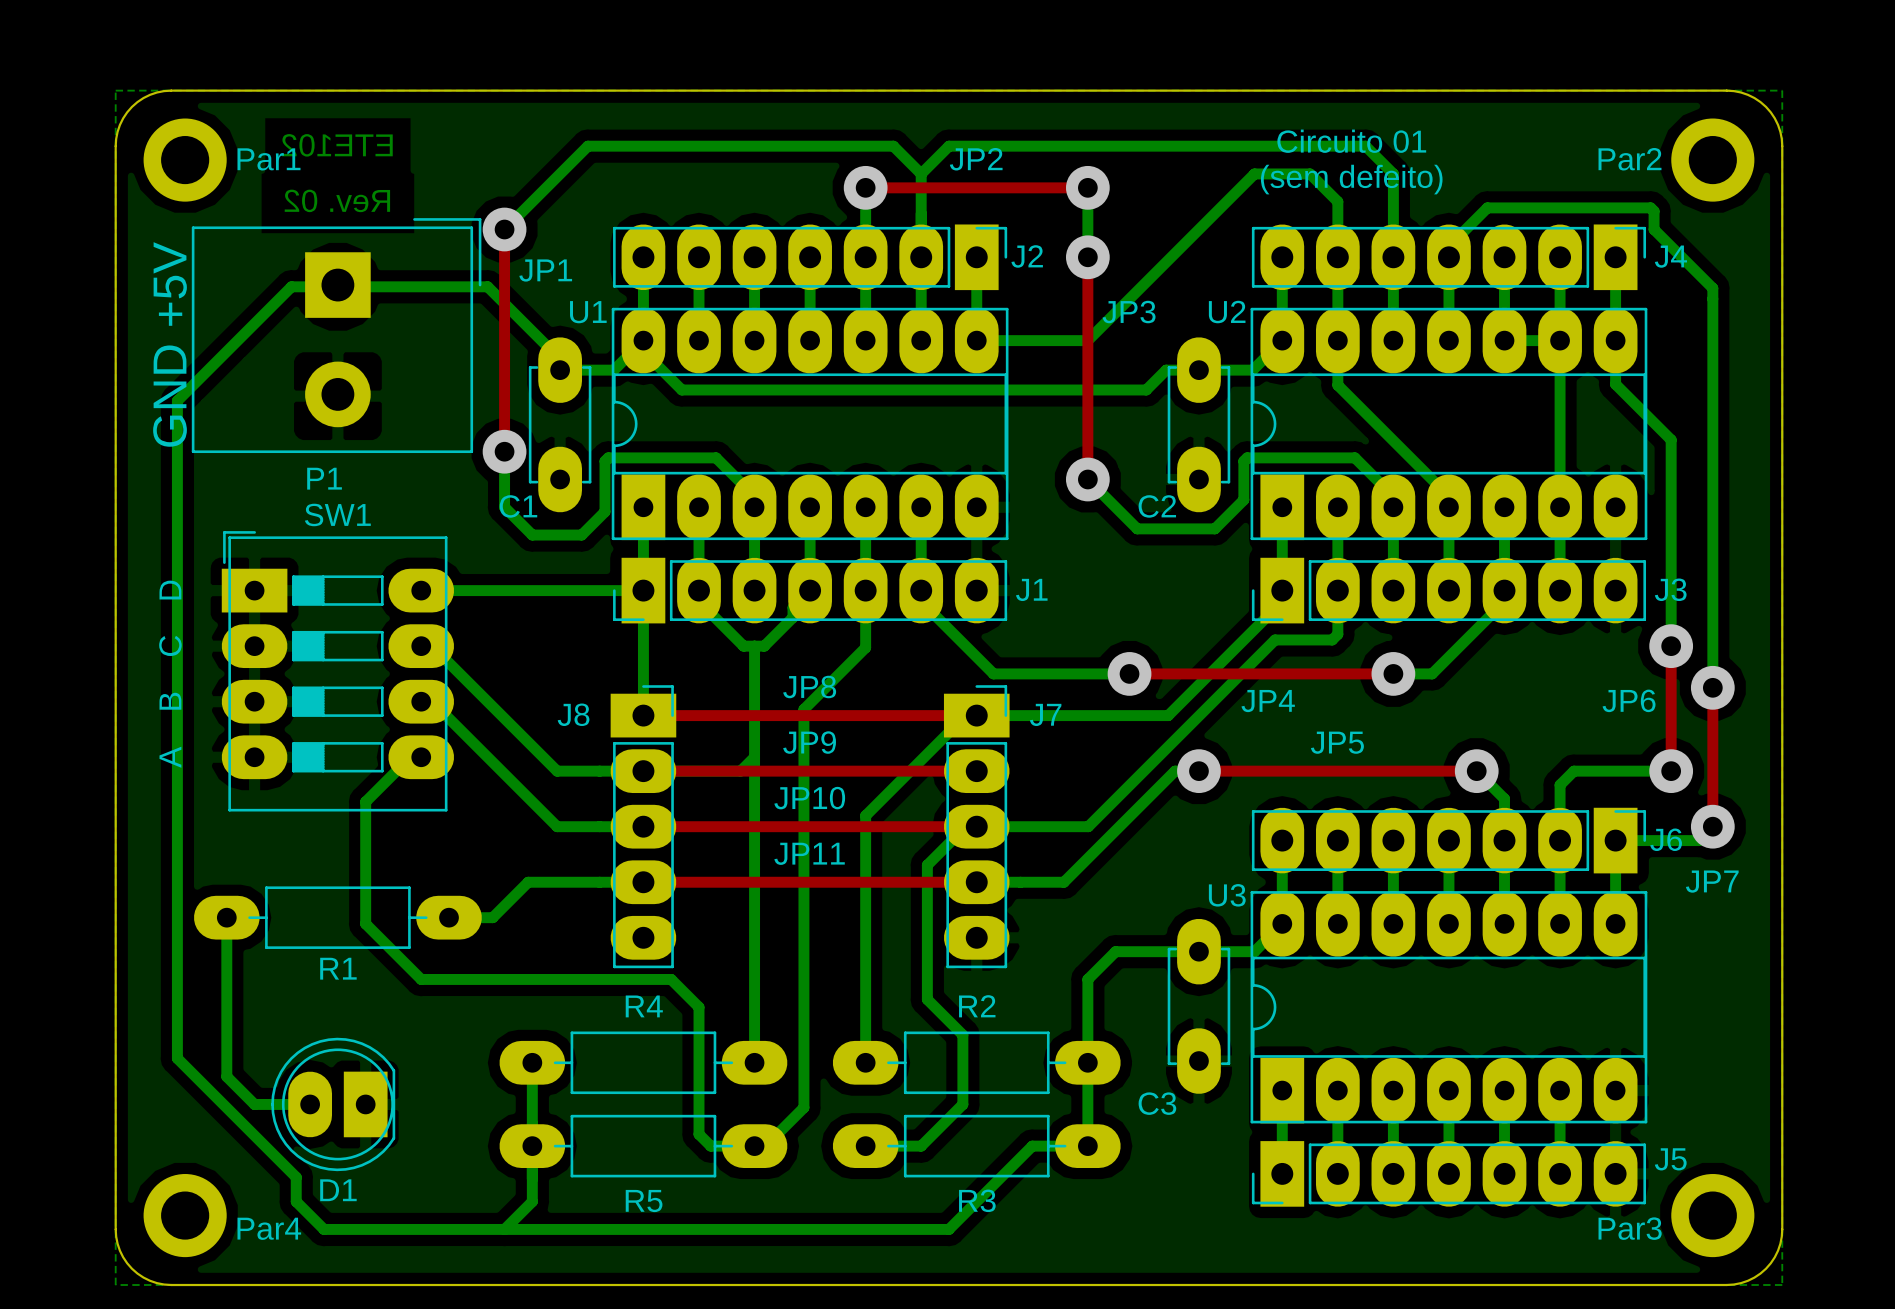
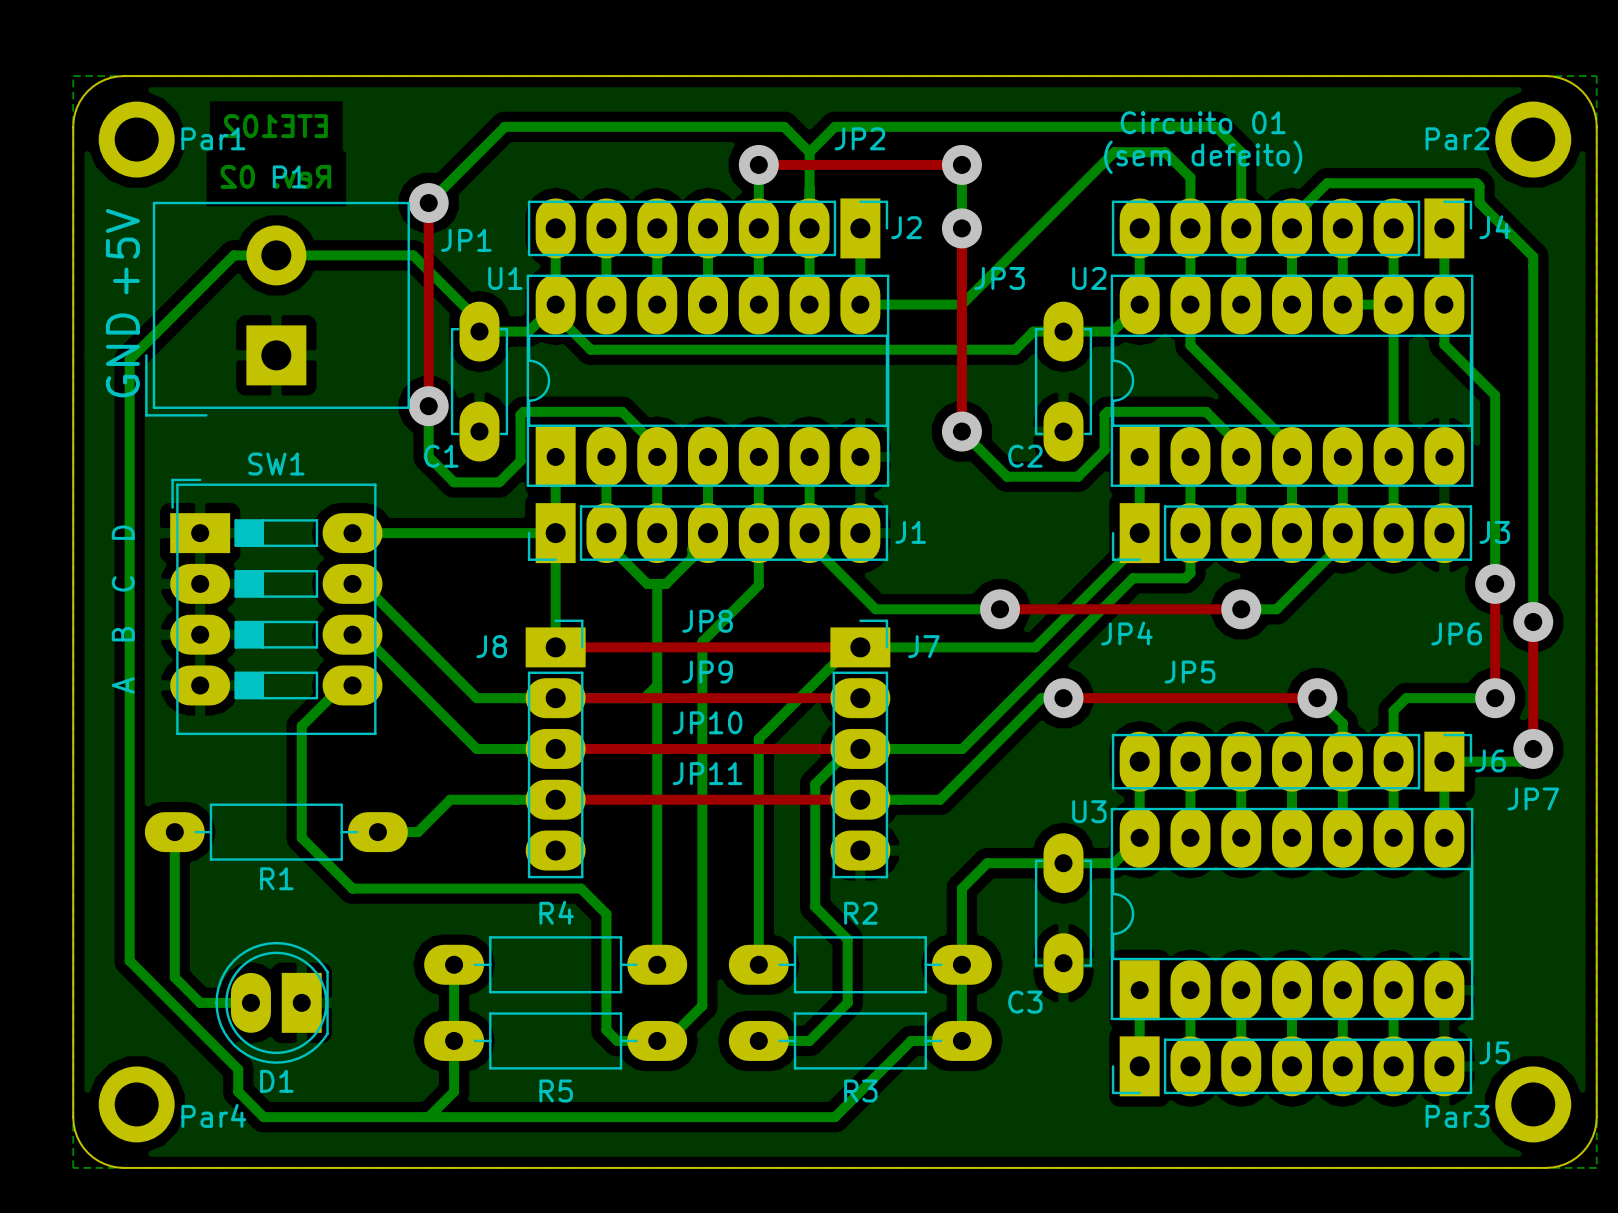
P1 rotation: 0° (336, 335) -> 180° (277, 309)

